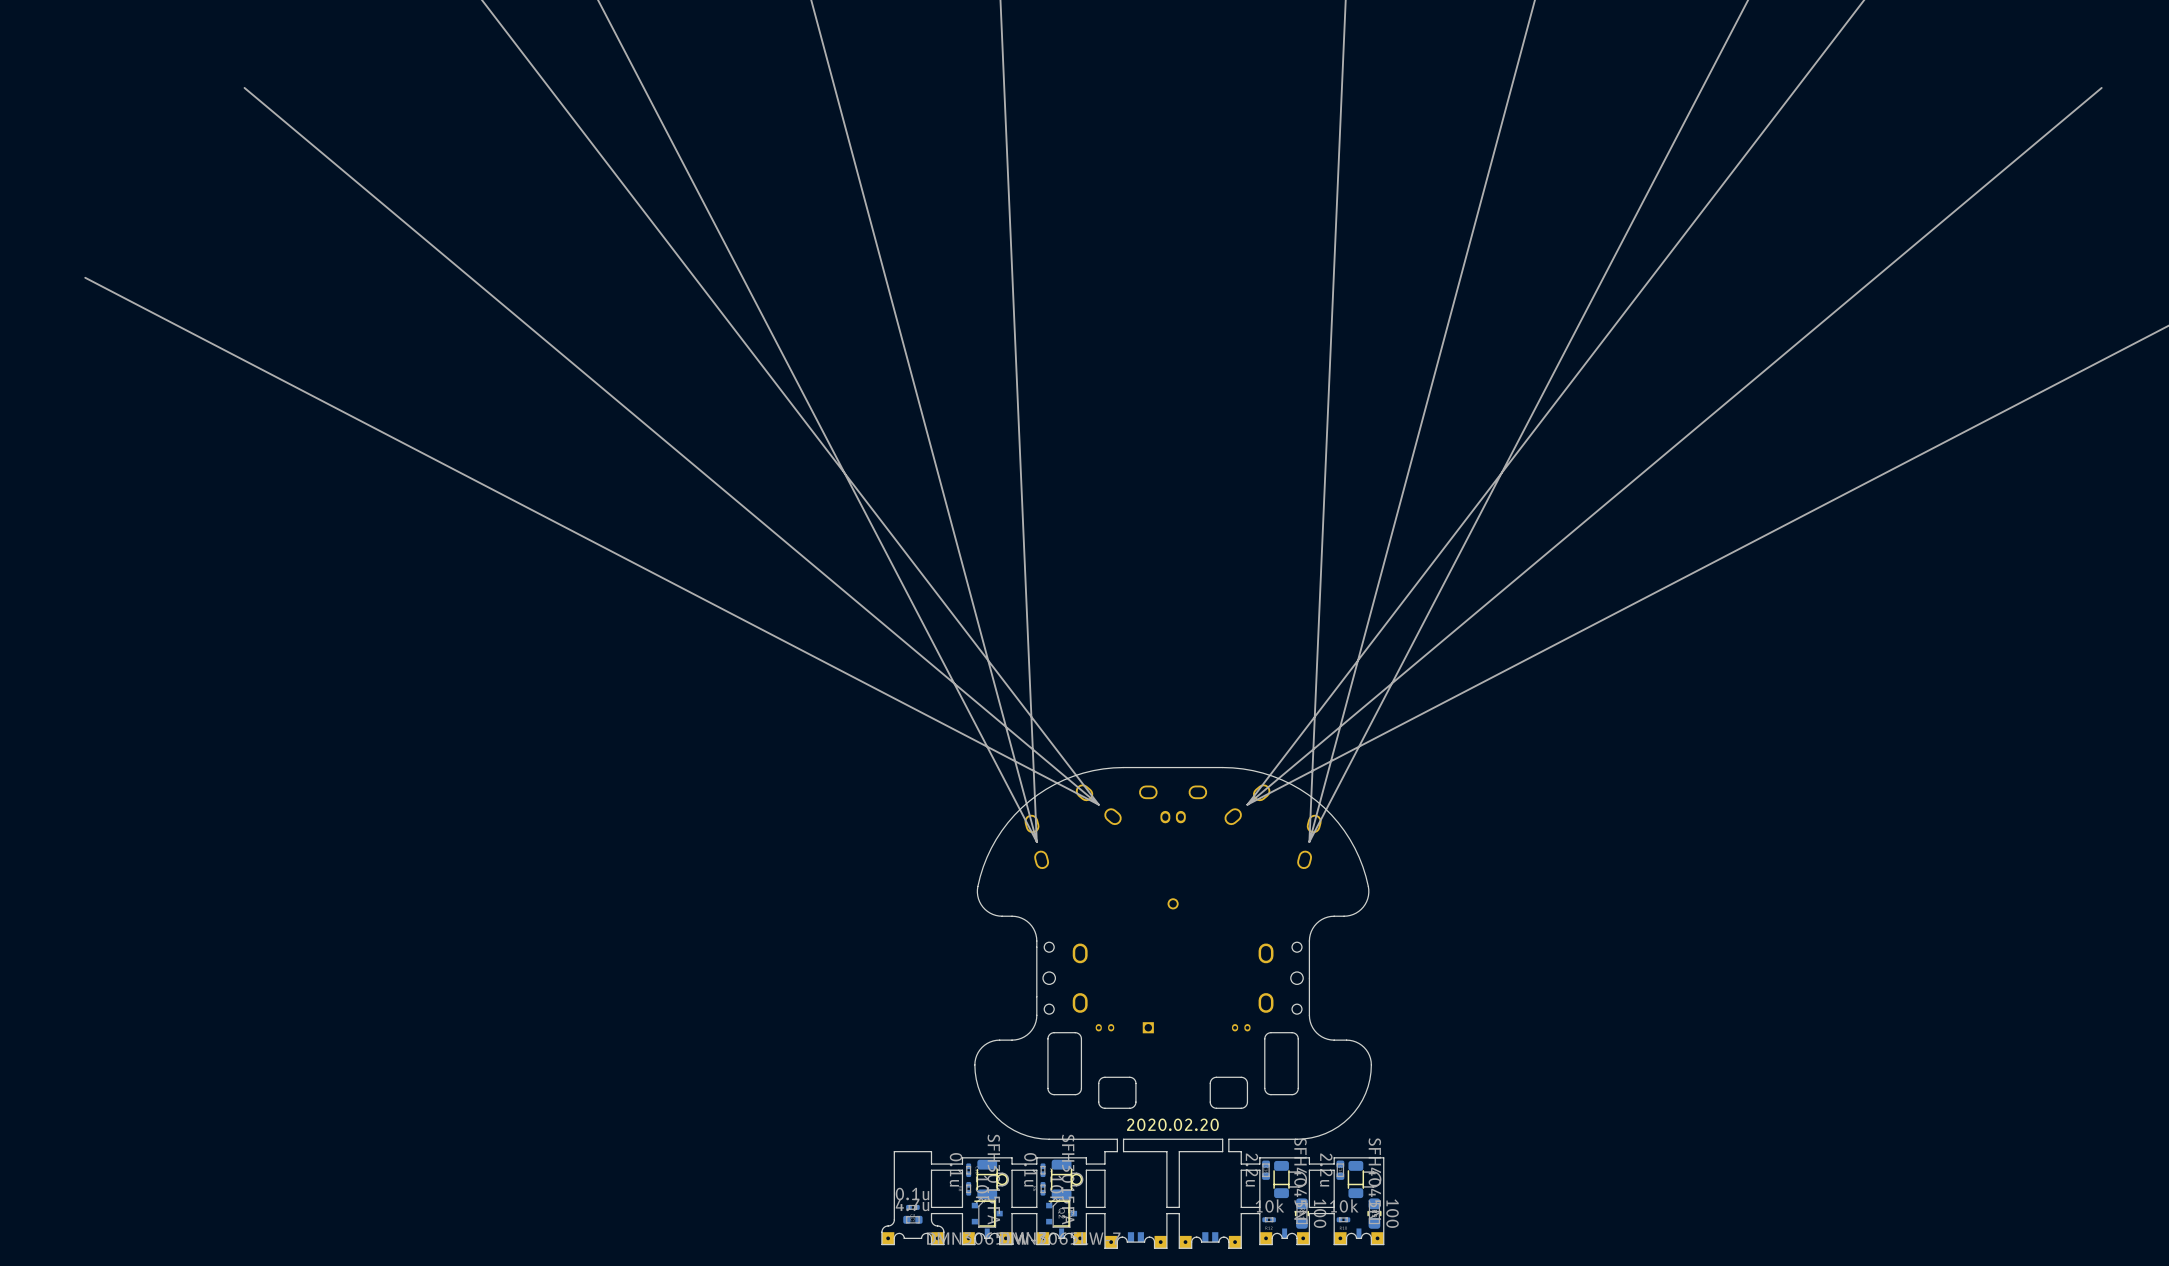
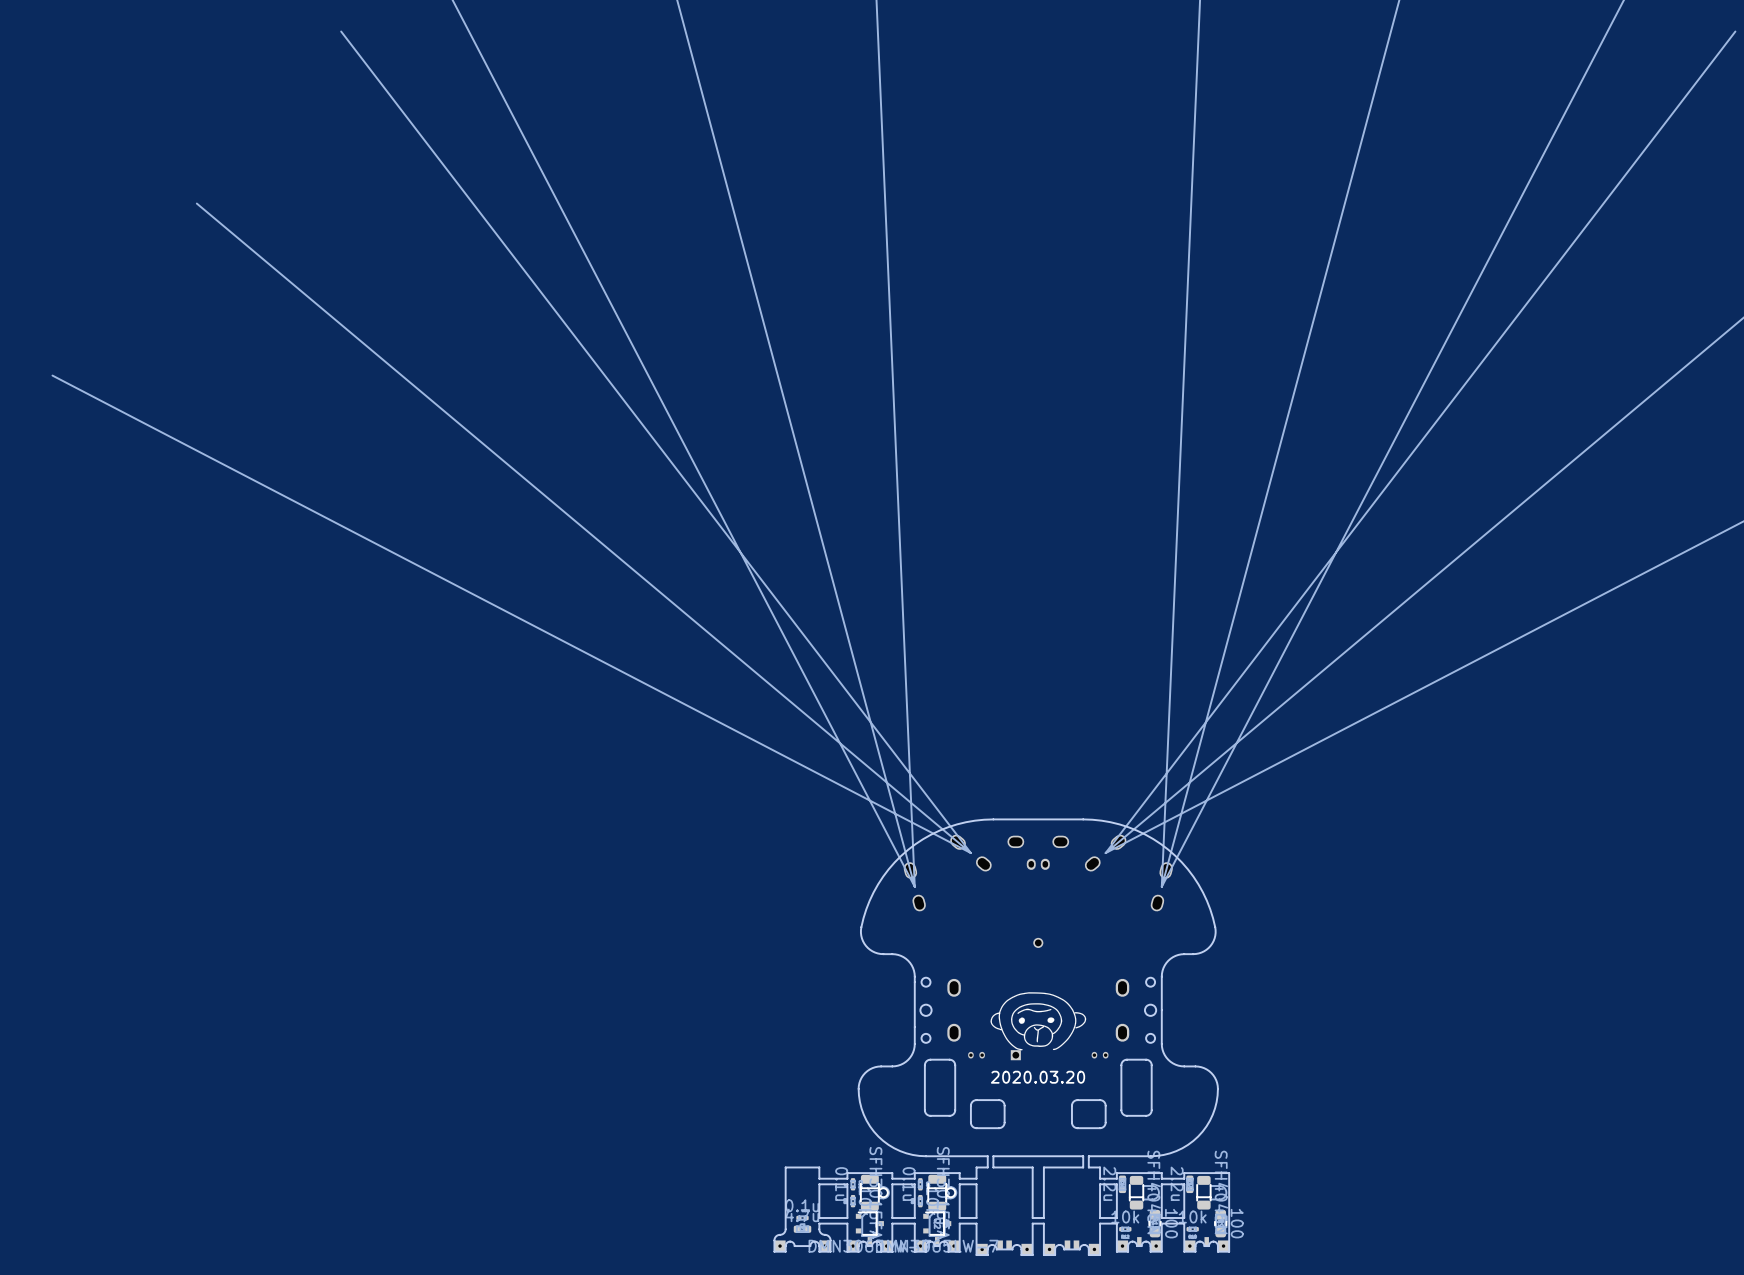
drawing: none -> [990, 992, 1087, 1051]
text: none -> 2020.03.20 (1038, 1077)
text: 2020.02.20 (1172, 1124) -> none

